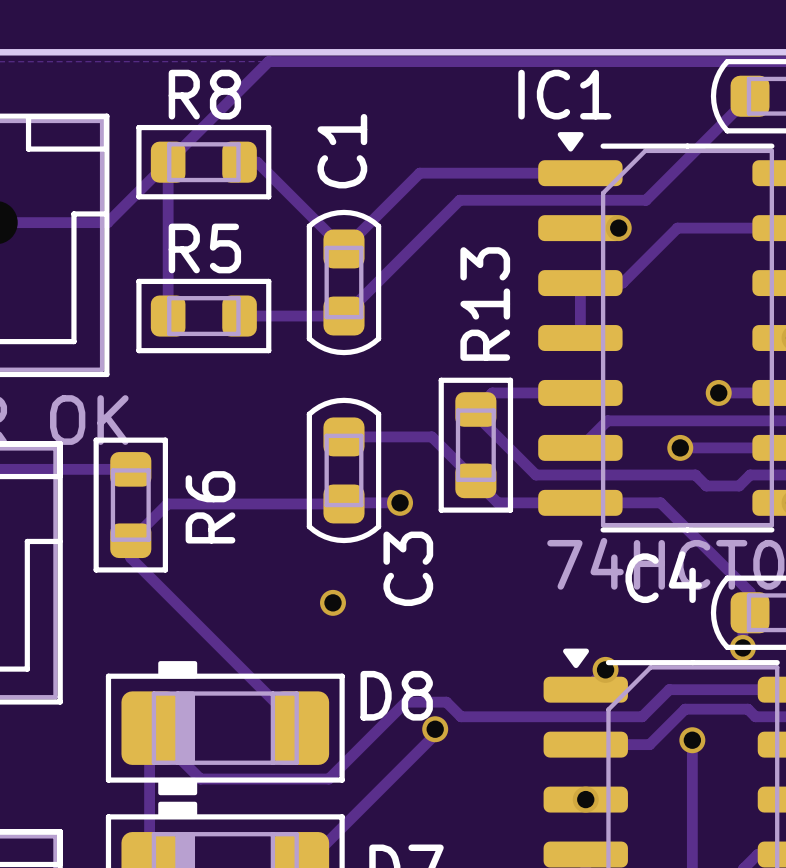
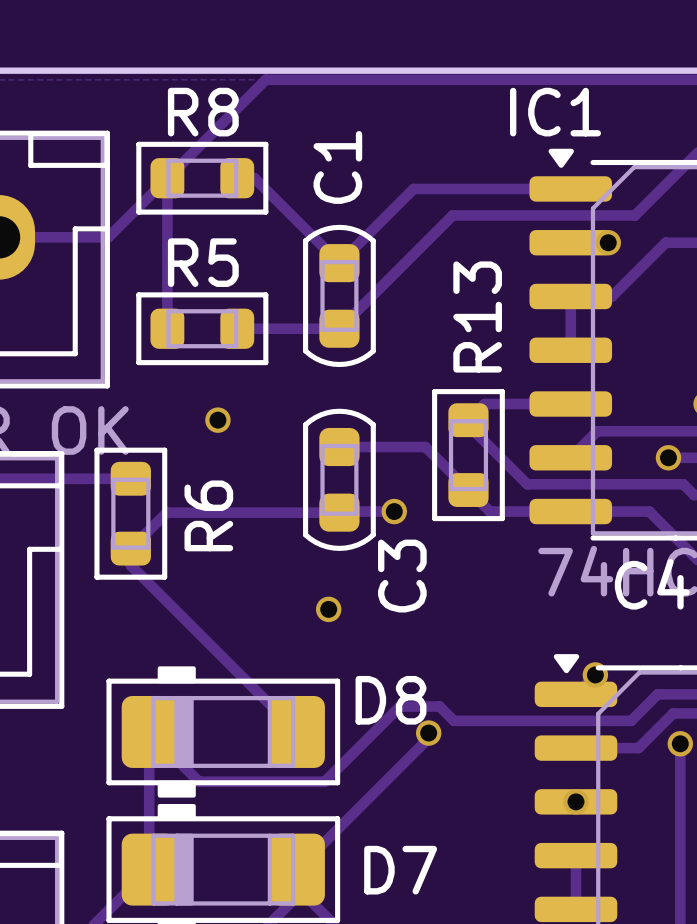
via: none -> (217, 420)

